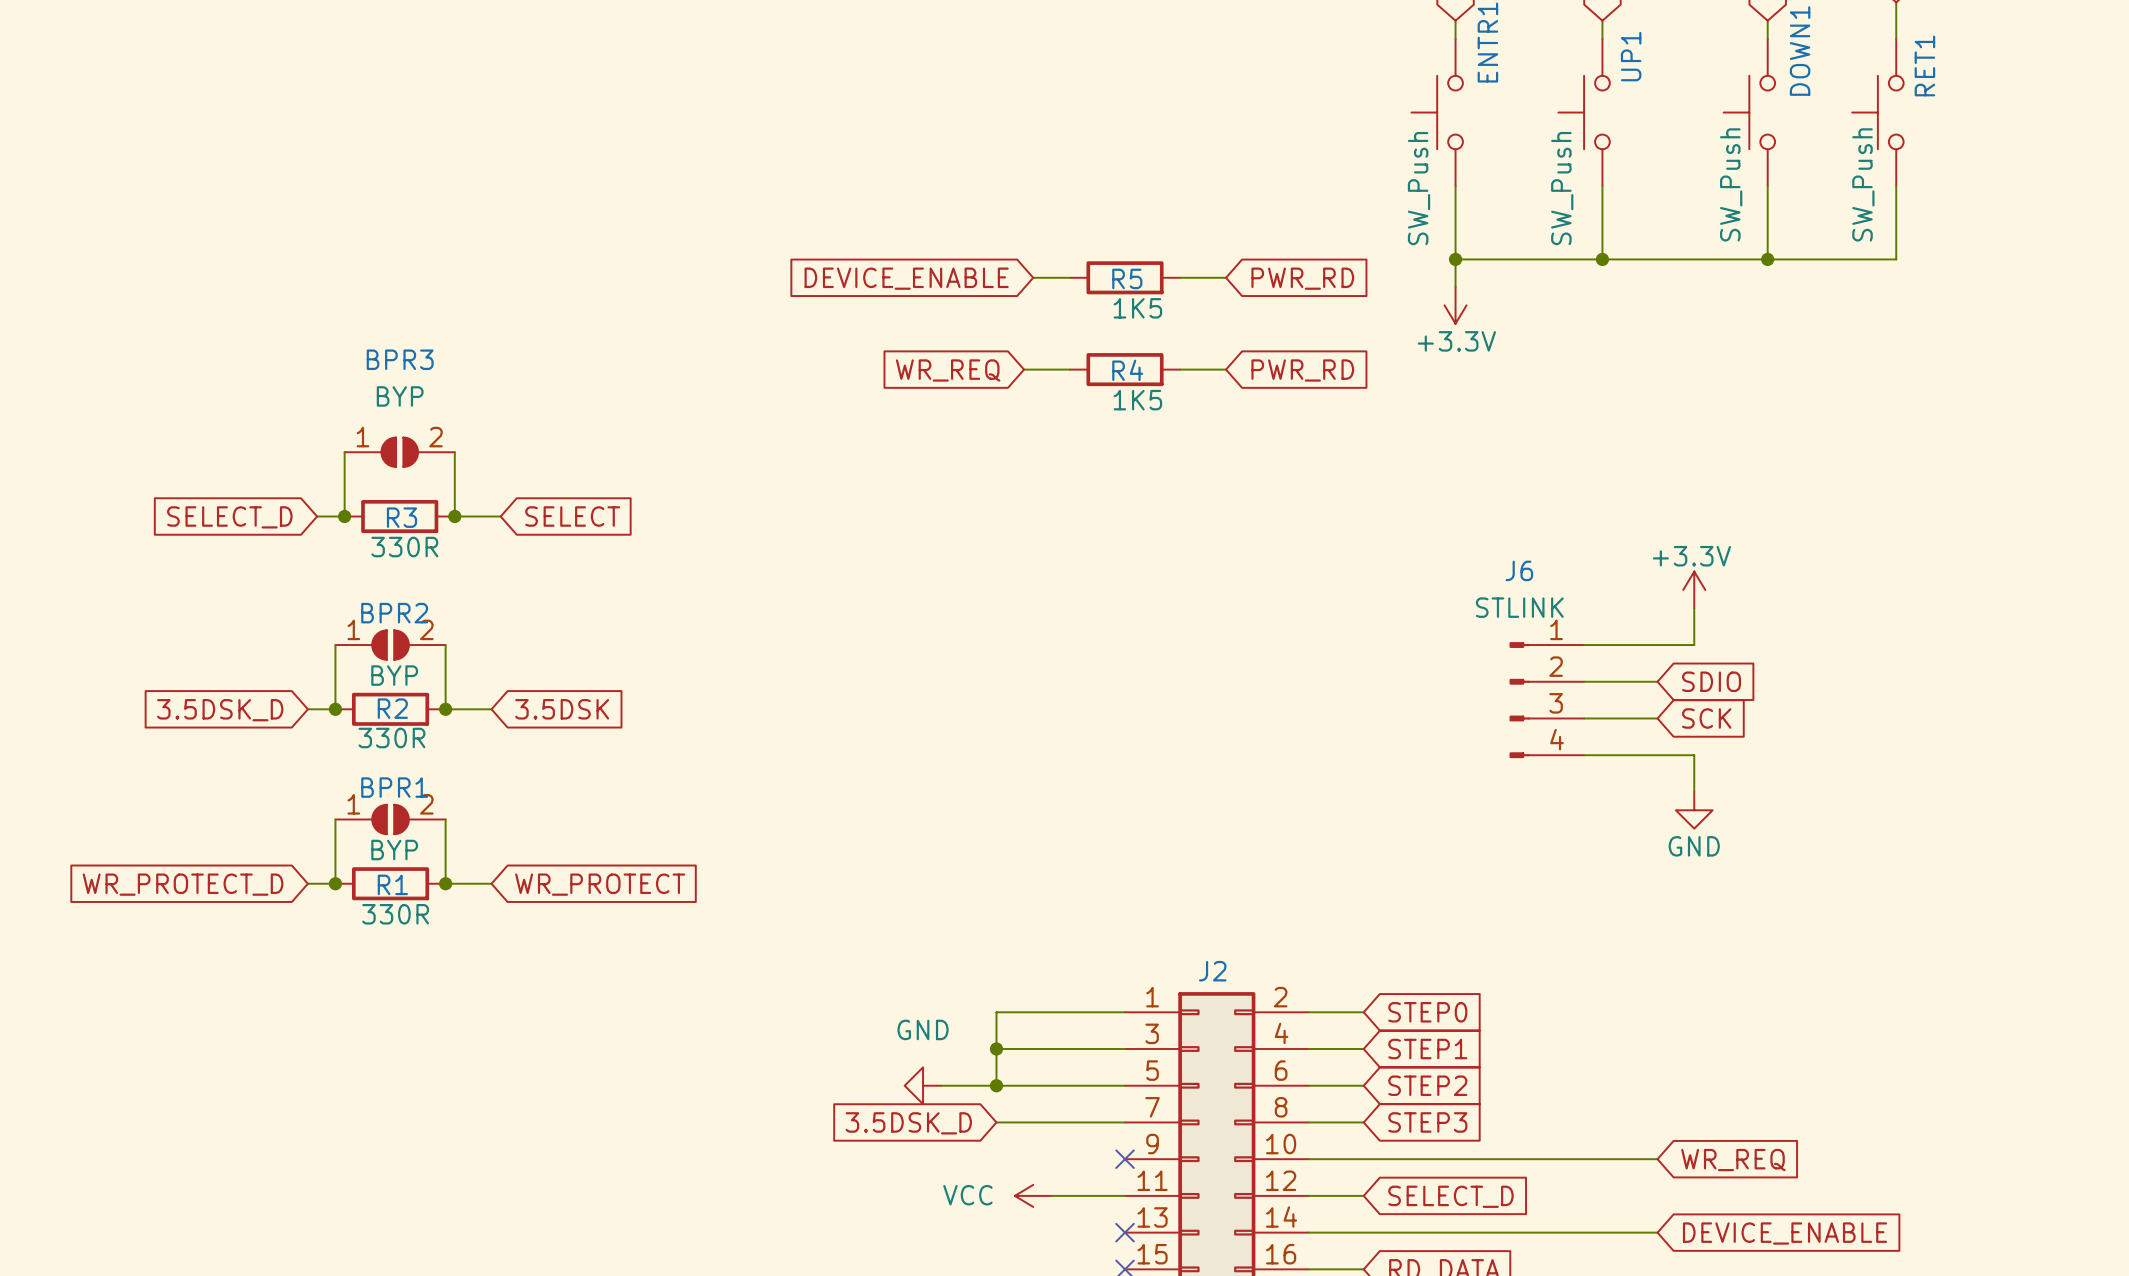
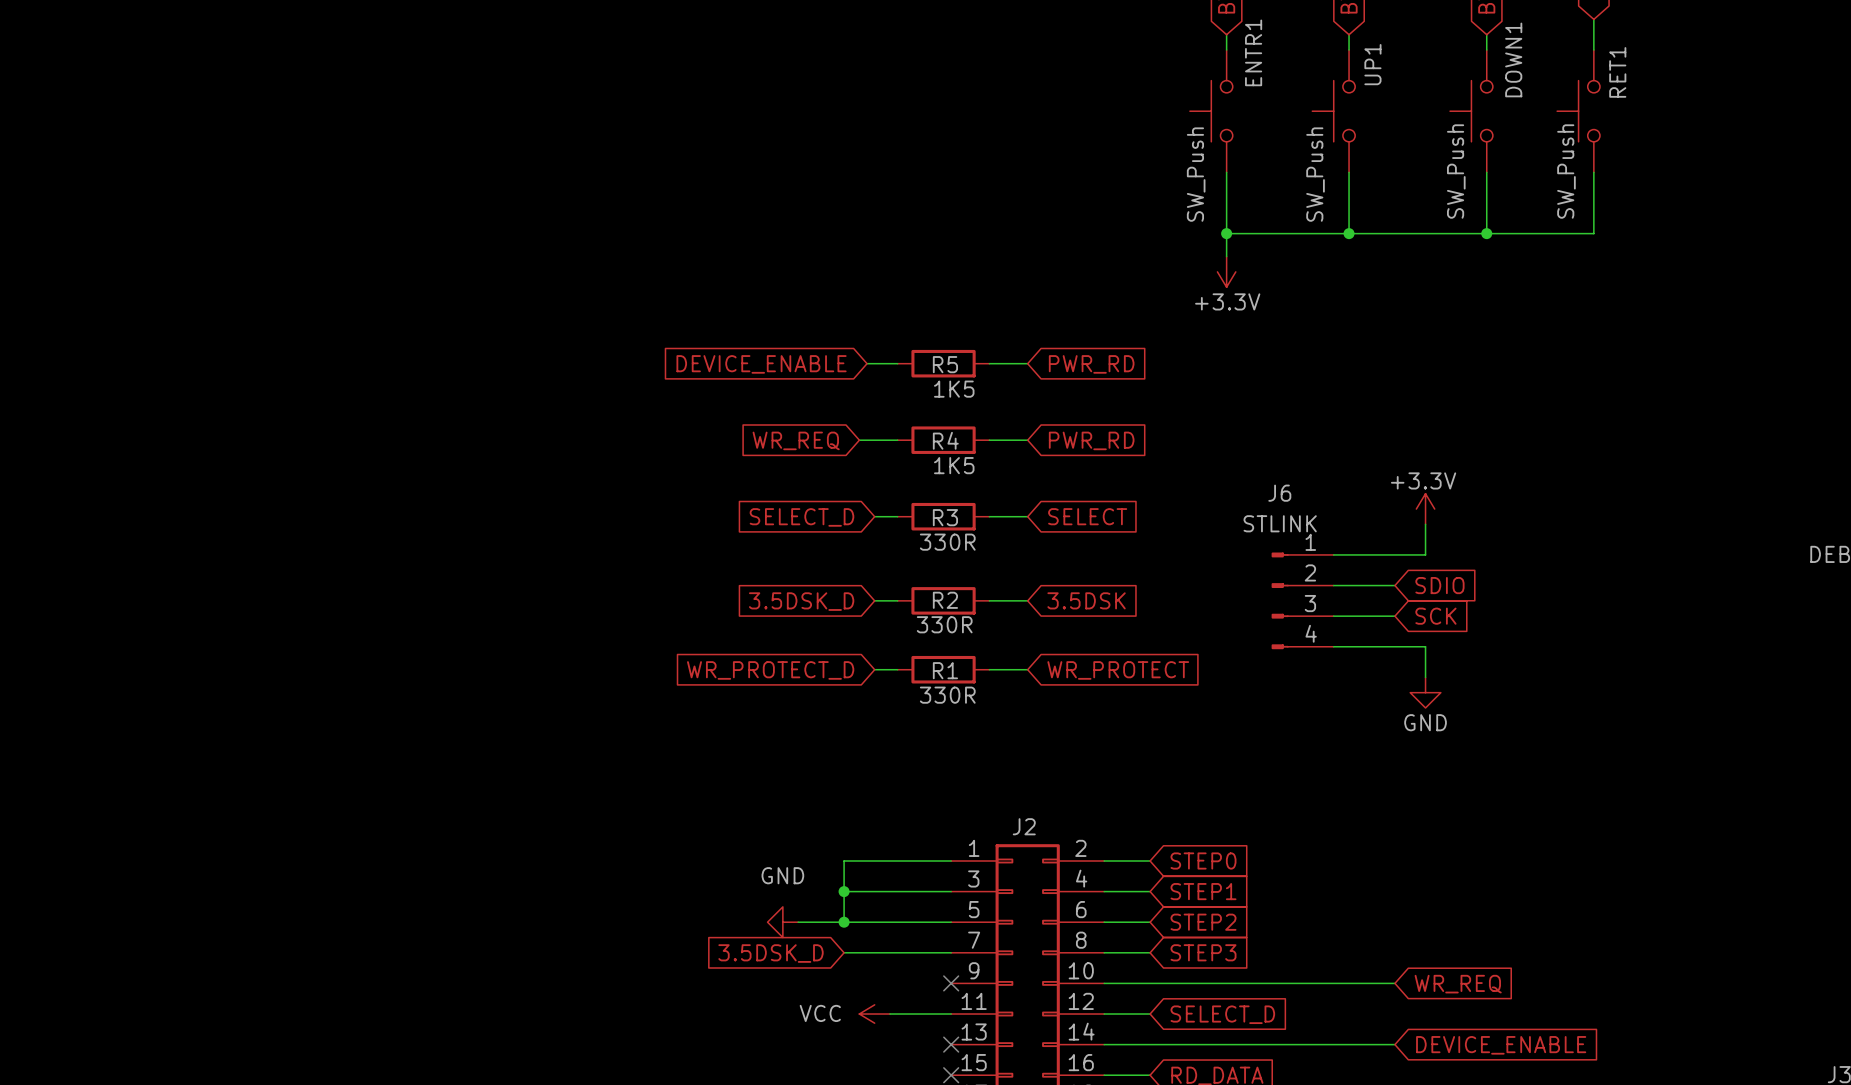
wire: (1033, 277) (1069, 277) -> (867, 363) (897, 363)
R5 position: (1125, 277) -> (943, 363)
wire: (1180, 277) (1226, 277) -> (989, 363) (1027, 363)
global label position: DEVICE_ENABLE (906, 278) -> DEVICE_ENABLE (761, 364)
global label: PWR_RD (1302, 278) -> none
wire: (1024, 369) (1069, 369) -> (859, 440) (897, 440)
R4 position: (1125, 369) -> (943, 440)
wire: (1180, 369) (1226, 369) -> (989, 440) (1027, 440)
global label position: WR_REQ (948, 370) -> WR_REQ (796, 440)
global label position: PWR_RD (1302, 370) -> PWR_RD (1091, 364)
wire: (344, 452) (344, 516) (317, 516) -> none
BPR3: BYP (399, 452) -> none
wire: (454, 452) (454, 516) (500, 516) -> none
global label: none -> PWR_RD (1091, 440)
junction: (344, 516) -> none
R3 position: (399, 516) -> (943, 516)
junction: (454, 516) -> none
global label: SELECT (572, 516) -> none
global label: SELECT_D (229, 517) -> none
wire: none -> (874, 516) (897, 516)
wire: none -> (989, 516) (1027, 516)
global label: none -> SELECT (1087, 516)
global label: none -> SELECT_D (801, 517)
wire: (335, 645) (335, 709) (307, 709) -> none
BPR2: BYP (390, 645) -> none
wire: (445, 645) (445, 709) (491, 709) -> none
wire: none -> (874, 600) (897, 600)
wire: none -> (989, 600) (1027, 600)
global label: none -> 3.5DSK (1086, 600)
global label: none -> 3.5DSK_D (801, 601)
junction: (335, 709) -> none
R2 position: (390, 709) -> (943, 600)
junction: (445, 709) -> none
global label: 3.5DSK (562, 709) -> none
global label: 3.5DSK_D (220, 710) -> none
wire: none -> (874, 669) (897, 669)
wire: none -> (989, 669) (1027, 669)
global label: none -> WR_PROTECT_D (770, 670)
global label: none -> WR_PROTECT (1118, 670)
wire: (335, 819) (335, 883) (307, 883) -> none
BPR1: BYP (390, 819) -> none
wire: (445, 819) (445, 883) (491, 883) -> none
junction: (335, 883) -> none
R1 position: (390, 883) -> (943, 669)
junction: (445, 883) -> none
global label: WR_PROTECT_D (183, 884) -> none
global label: WR_PROTECT (600, 884) -> none

